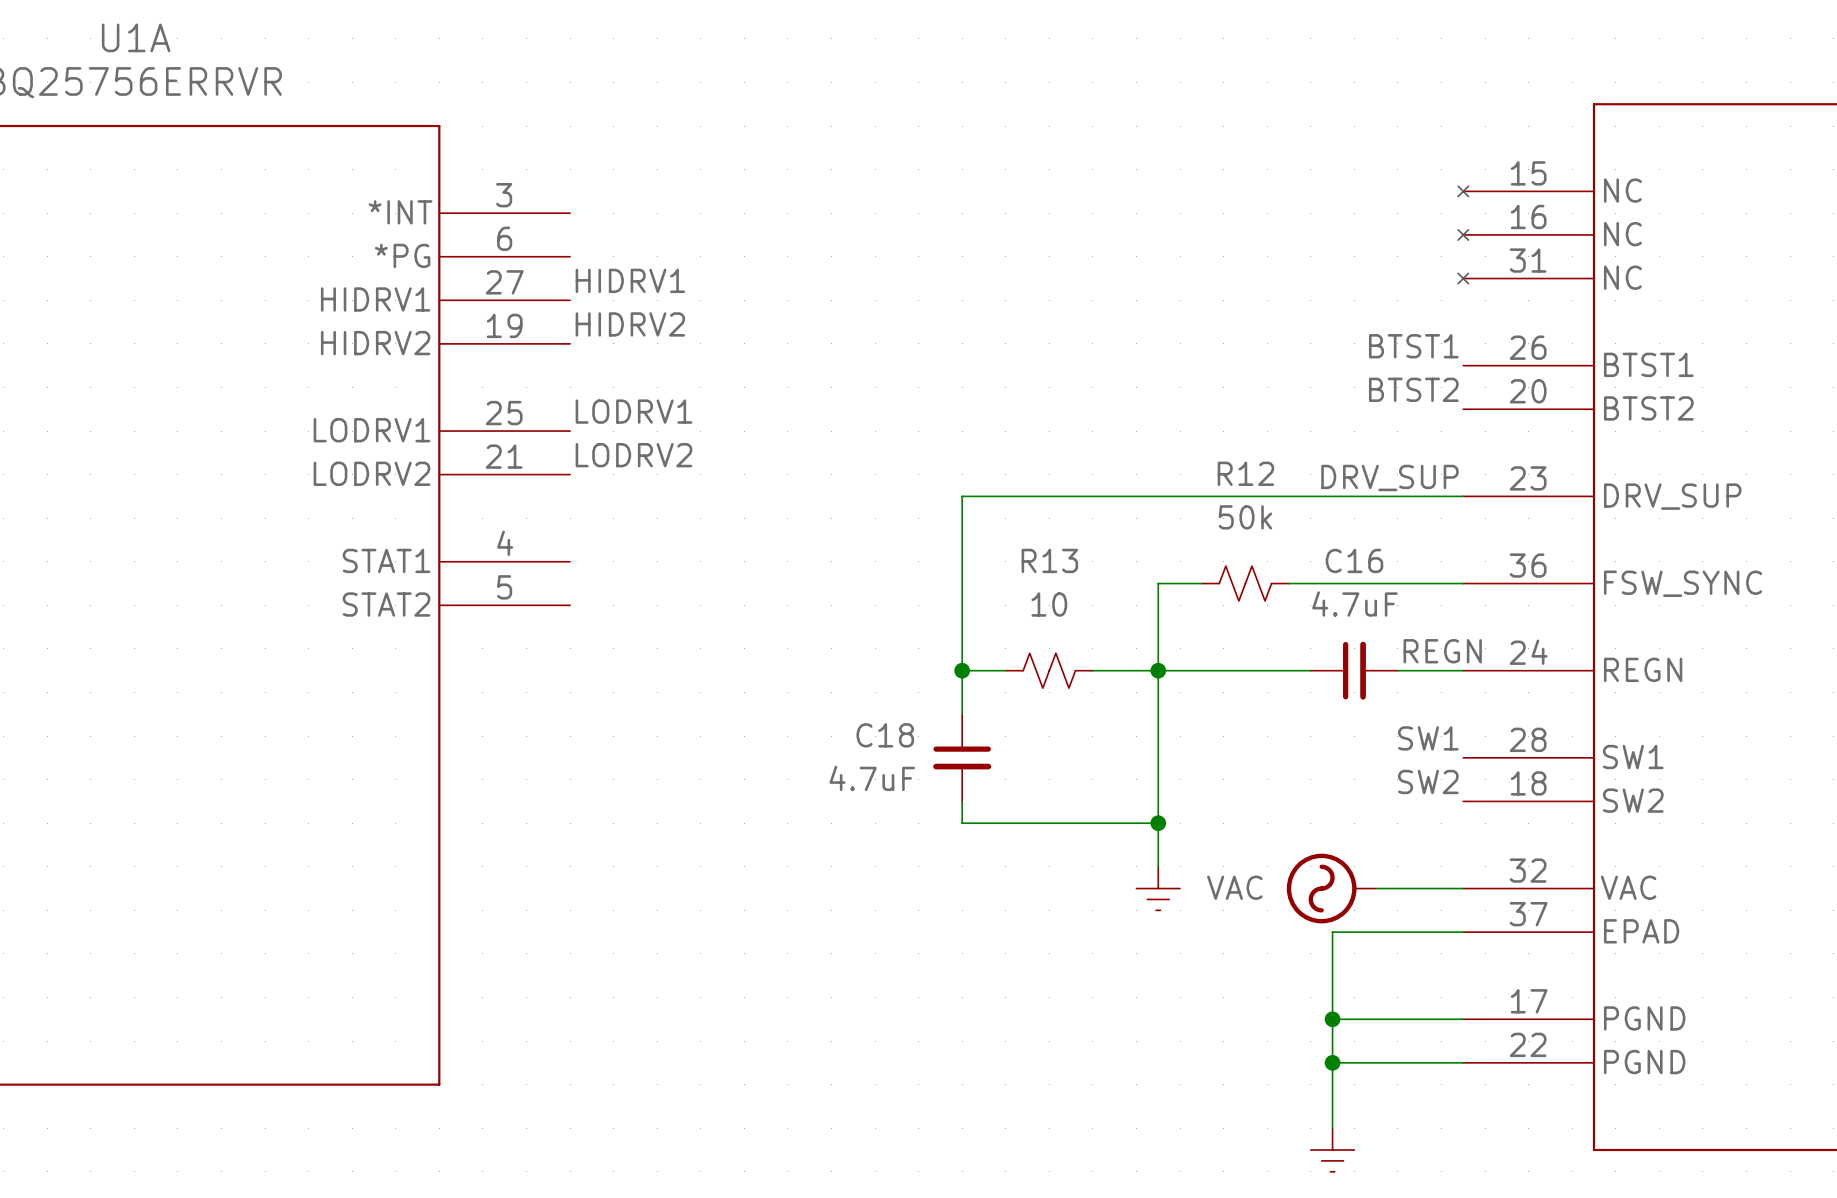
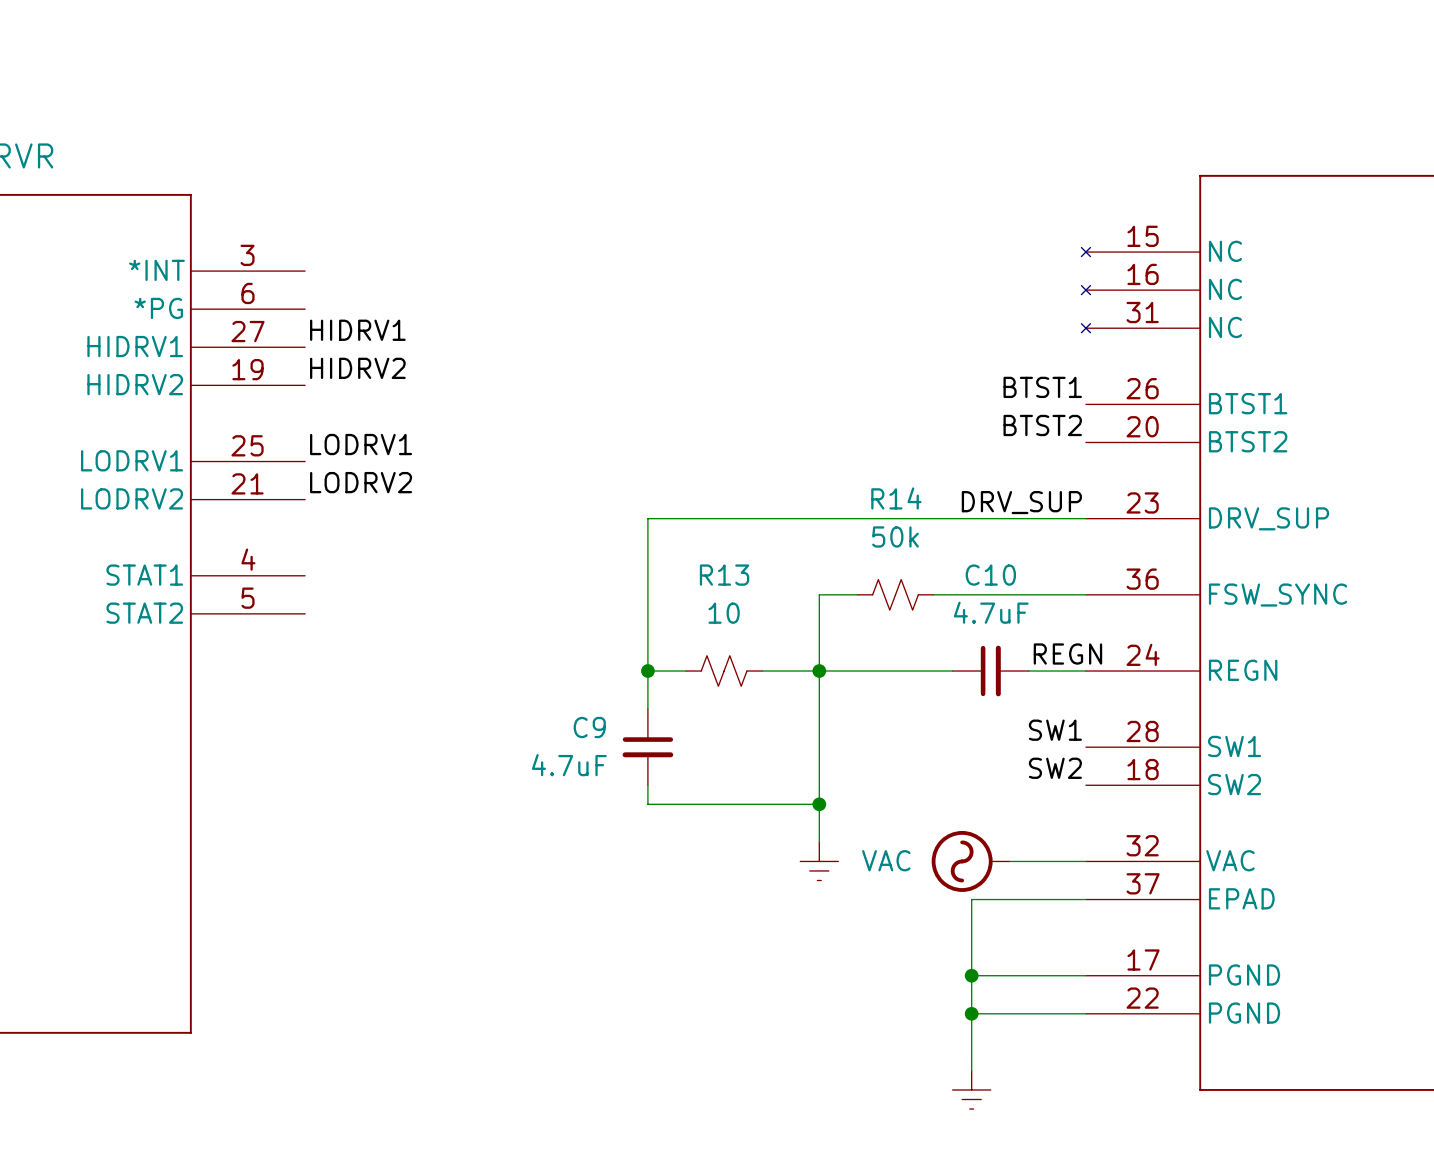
R12 name: R12 (1245, 473) -> R14 (896, 498)
C16 name: C16 (1354, 560) -> C10 (990, 575)
C18 name: C18 (885, 735) -> C9 (589, 727)

